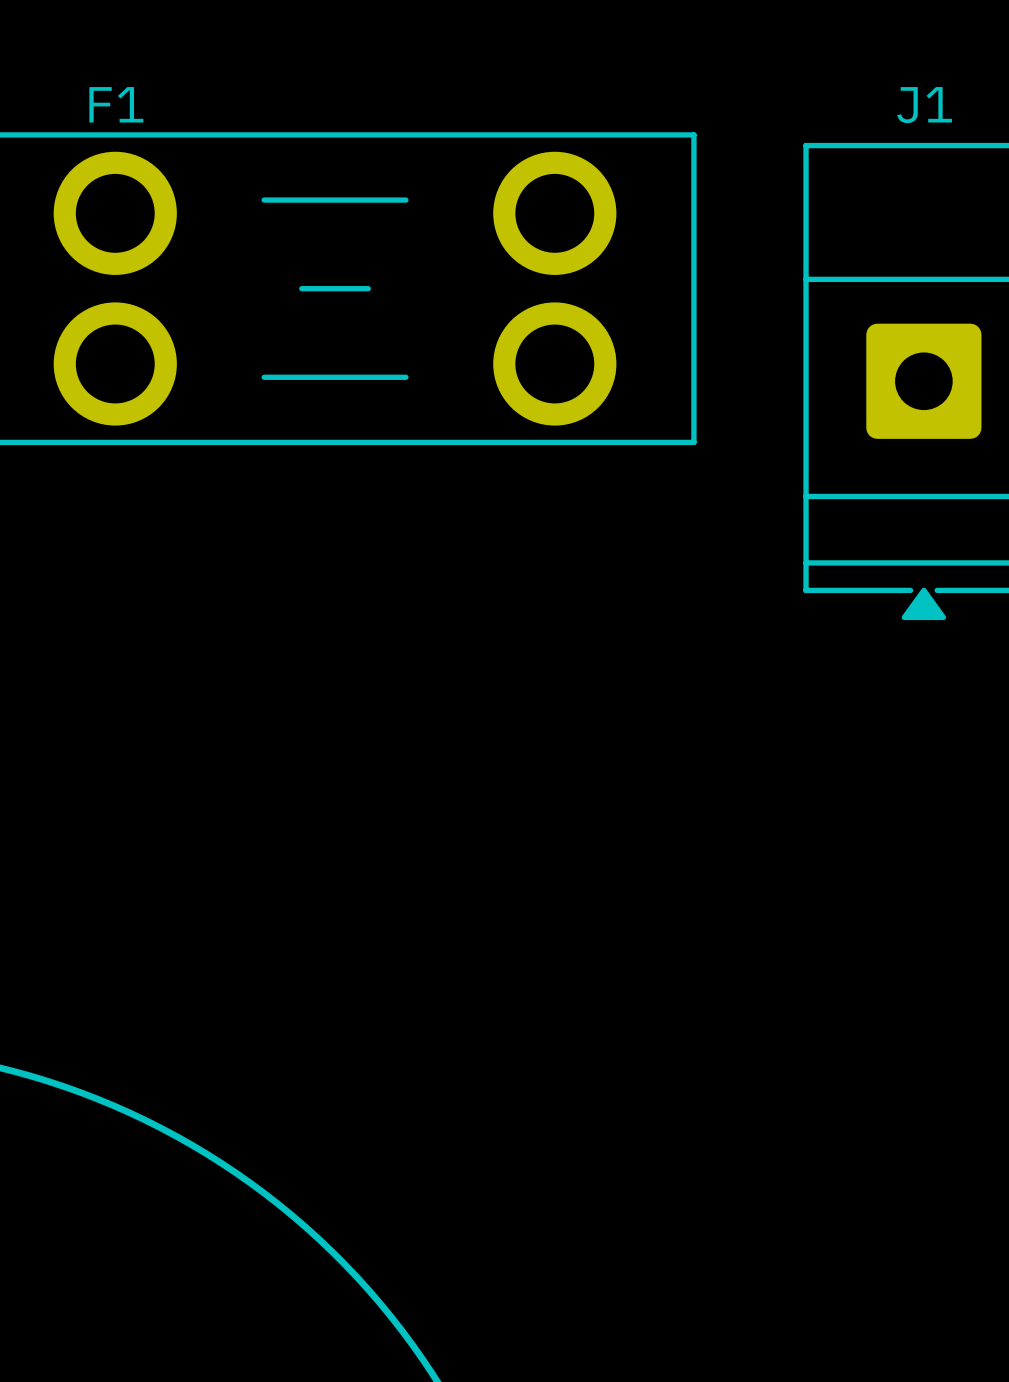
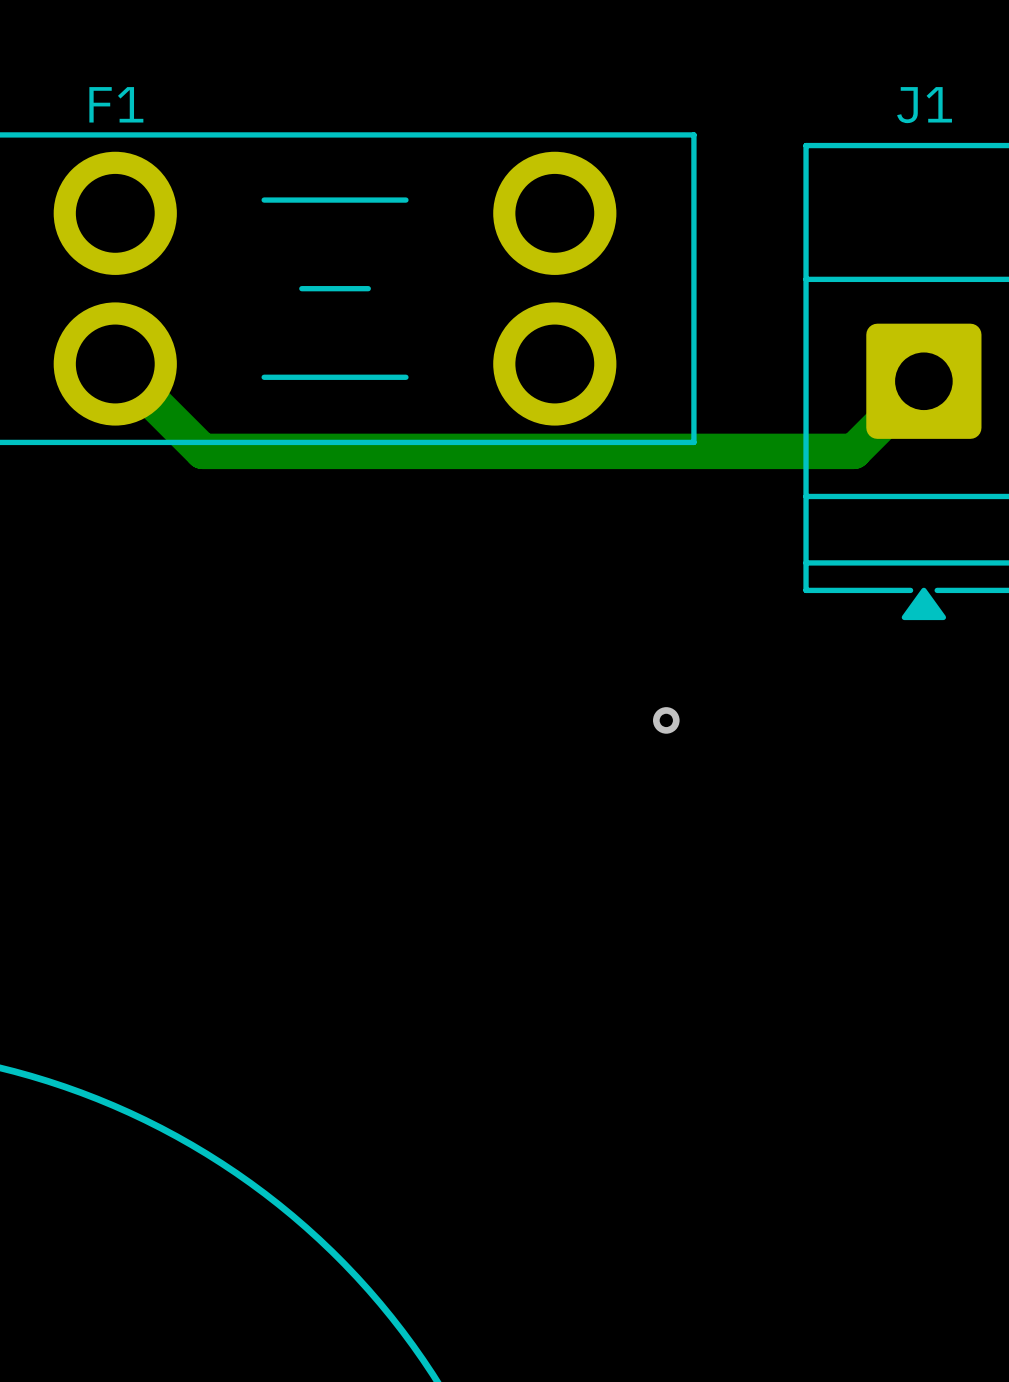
bottom track: none -> (115, 363) (202, 451) (853, 451) (923, 381)
via: none -> (666, 720)

